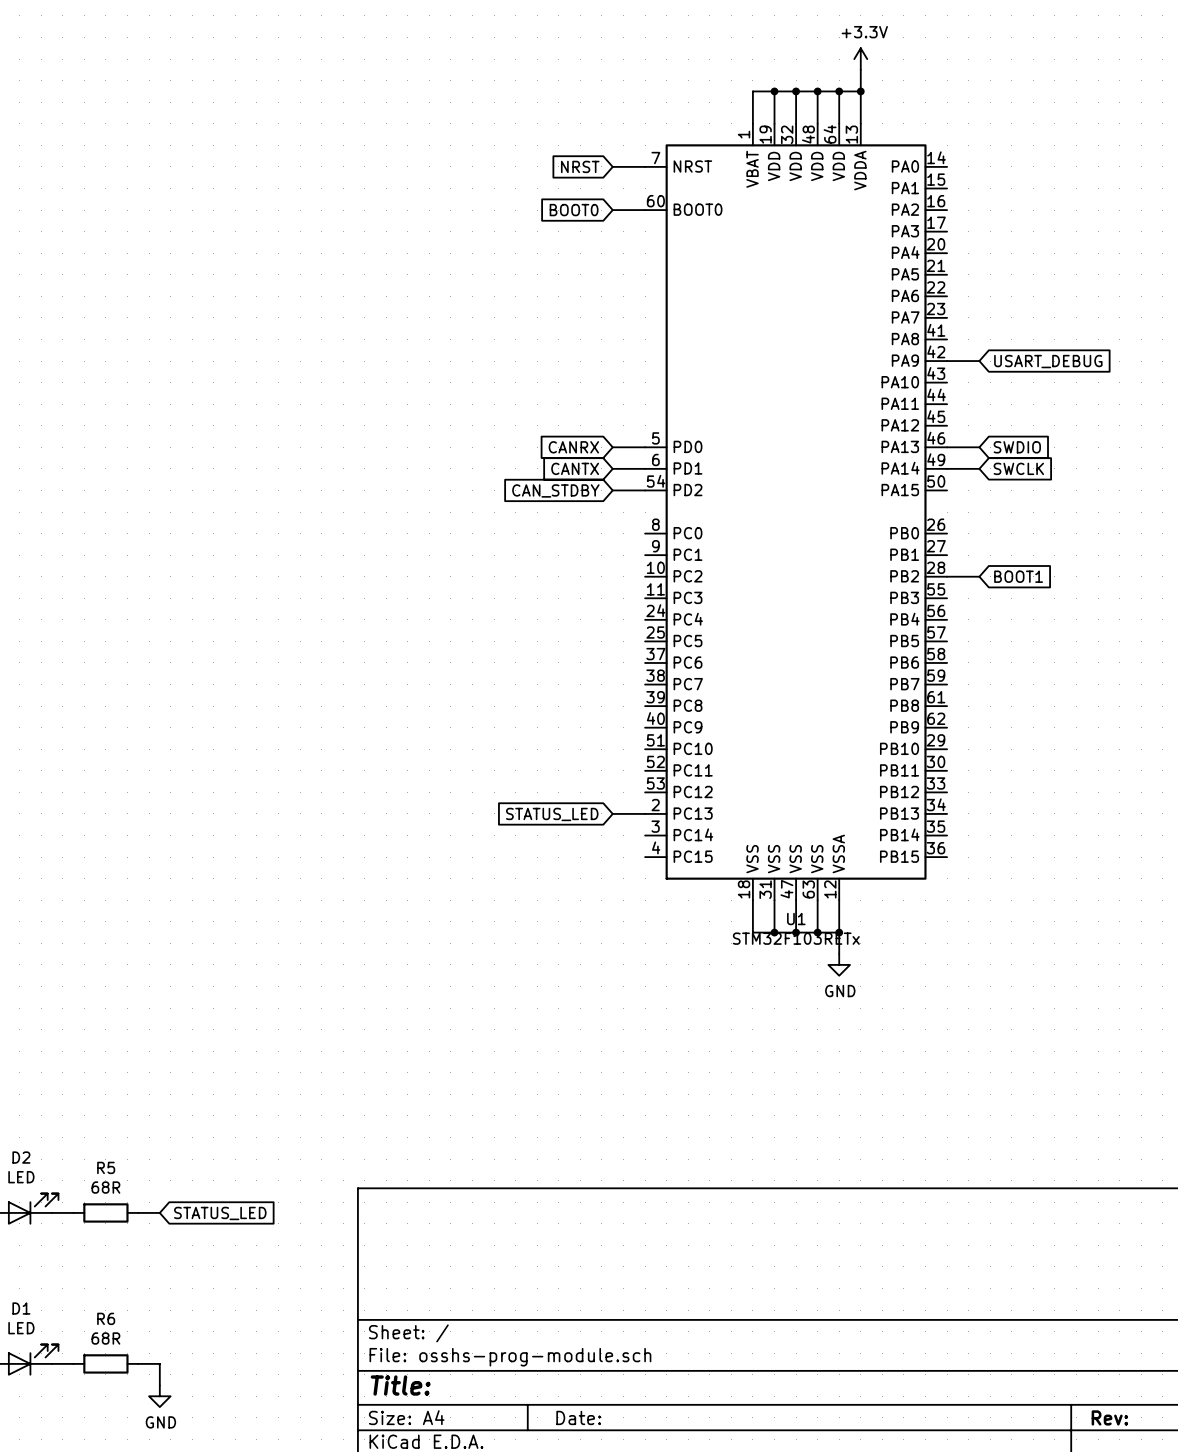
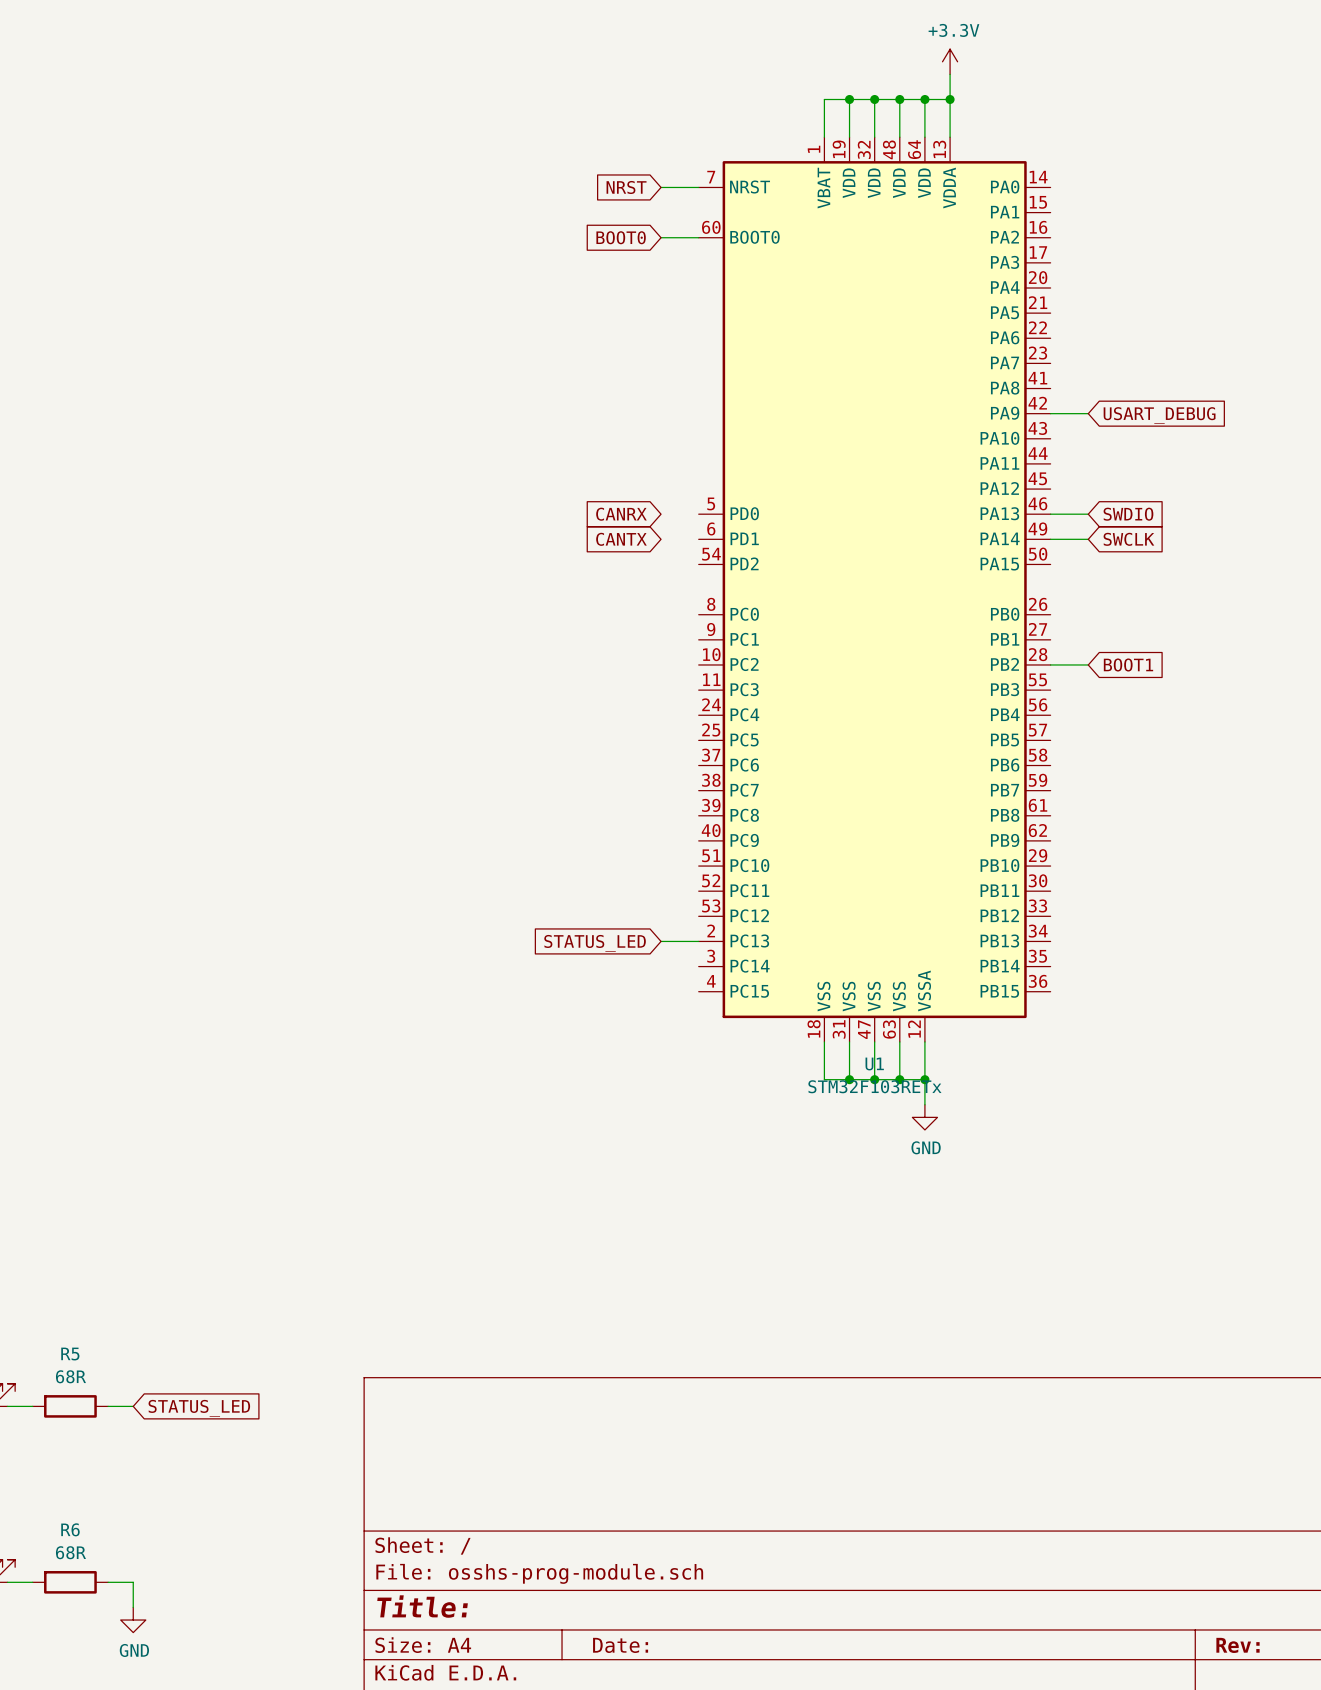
wire: (612, 447) (645, 447) -> none
wire: (612, 468) (645, 468) -> none
global label: CAN_STDBY (555, 490) -> none
wire: (612, 490) (645, 490) -> none

